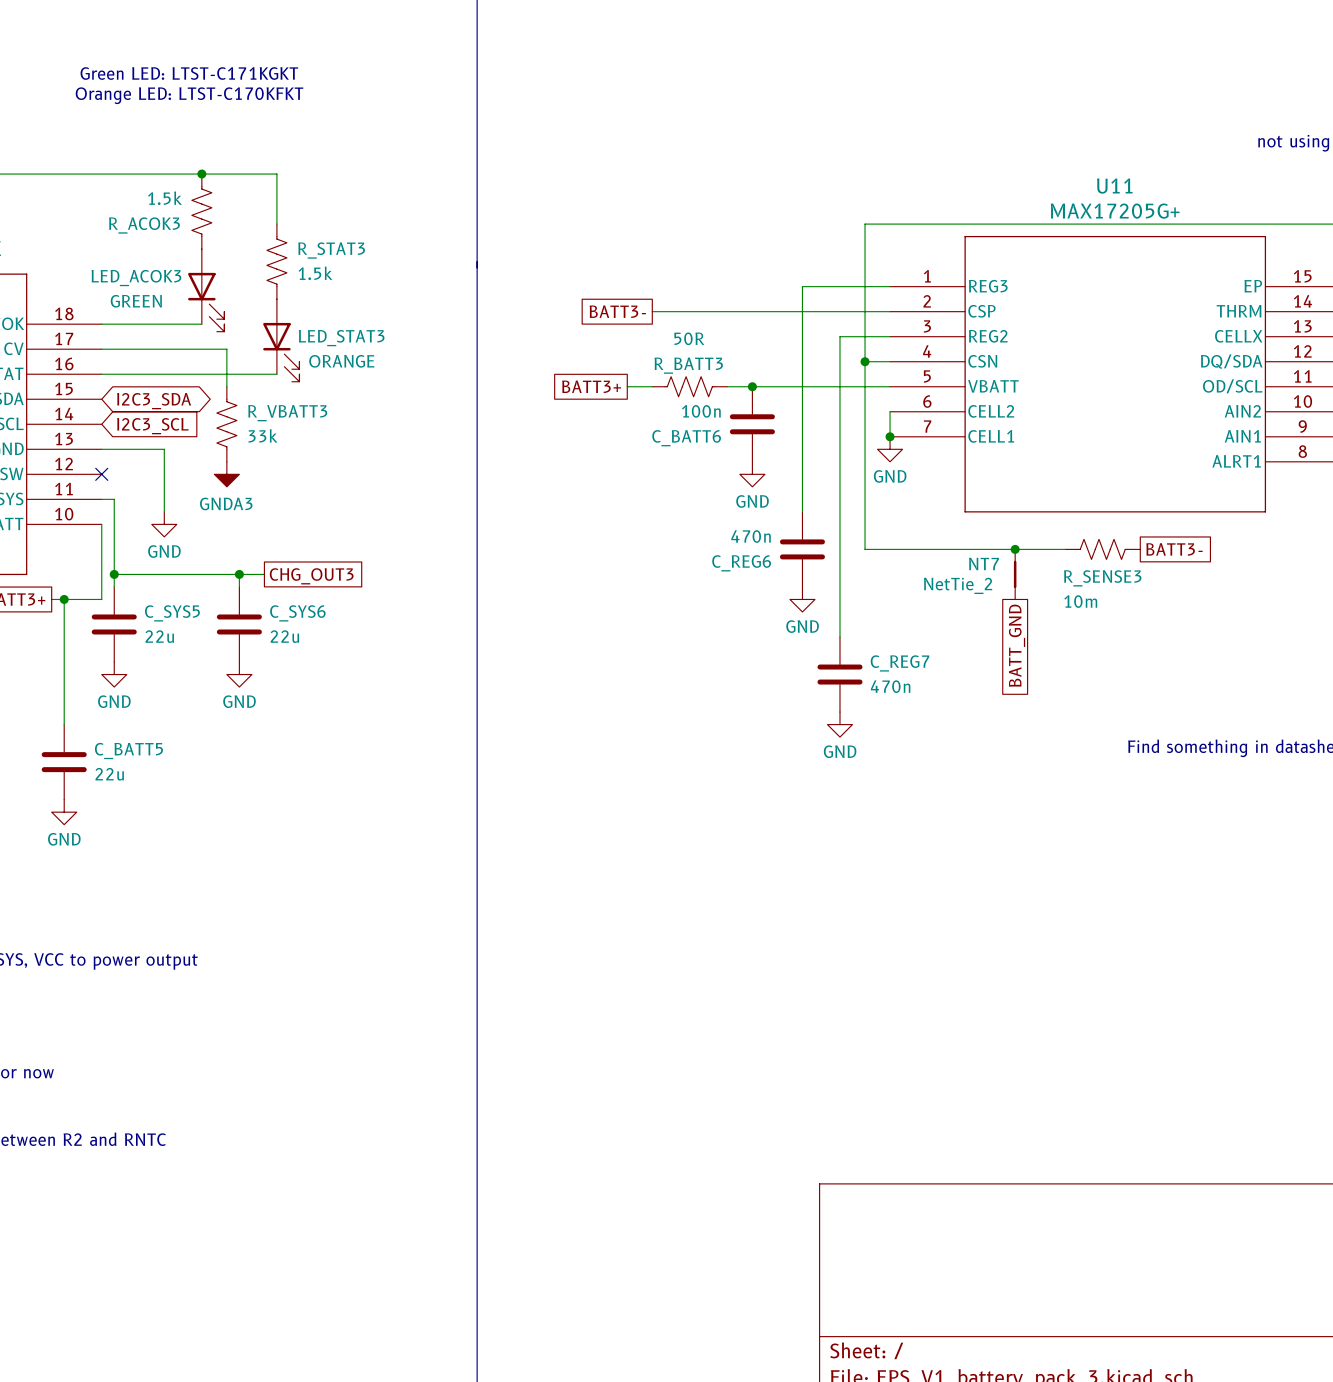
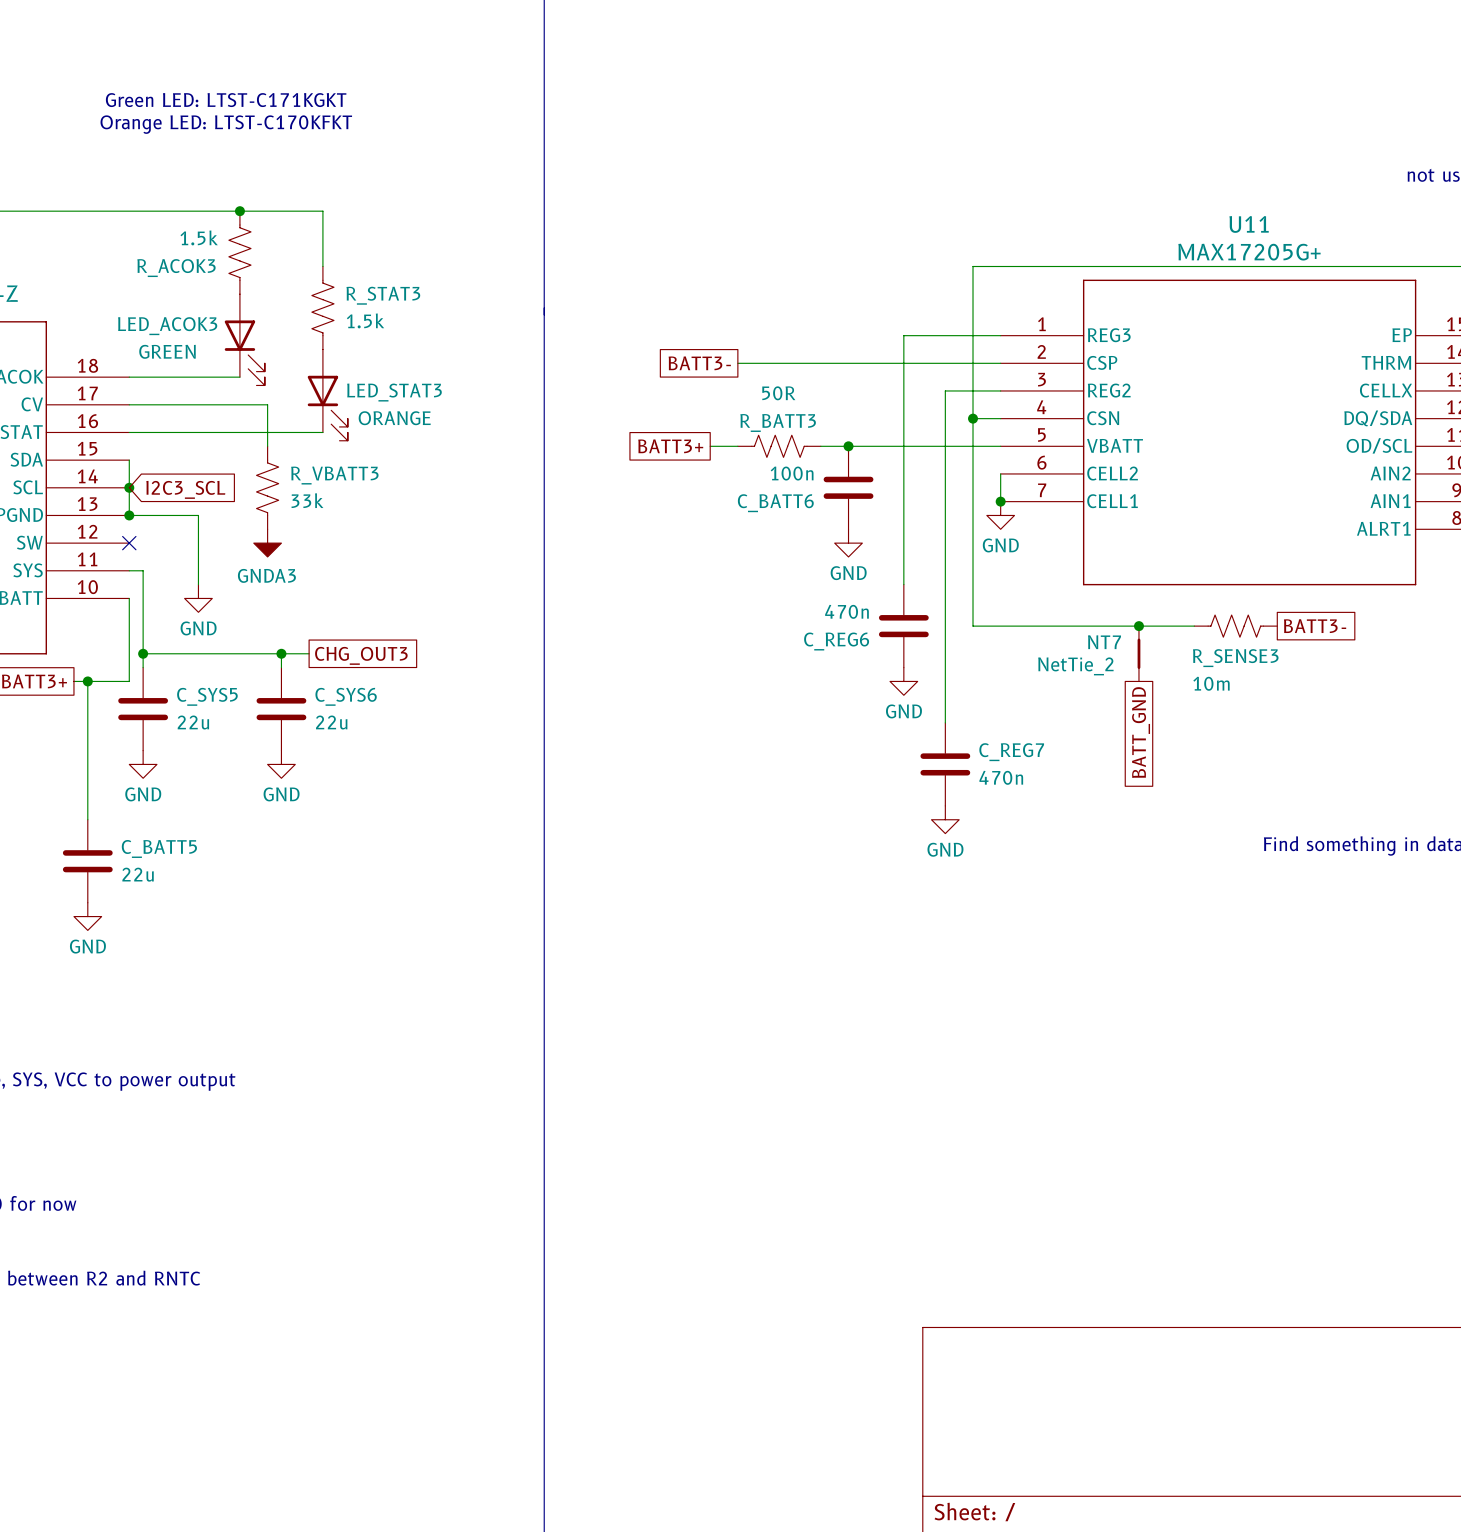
wire: none -> (129, 460) (129, 515)
global label: I2C3_SDA (154, 401) -> none
junction: none -> (129, 487)
junction: none -> (129, 515)

